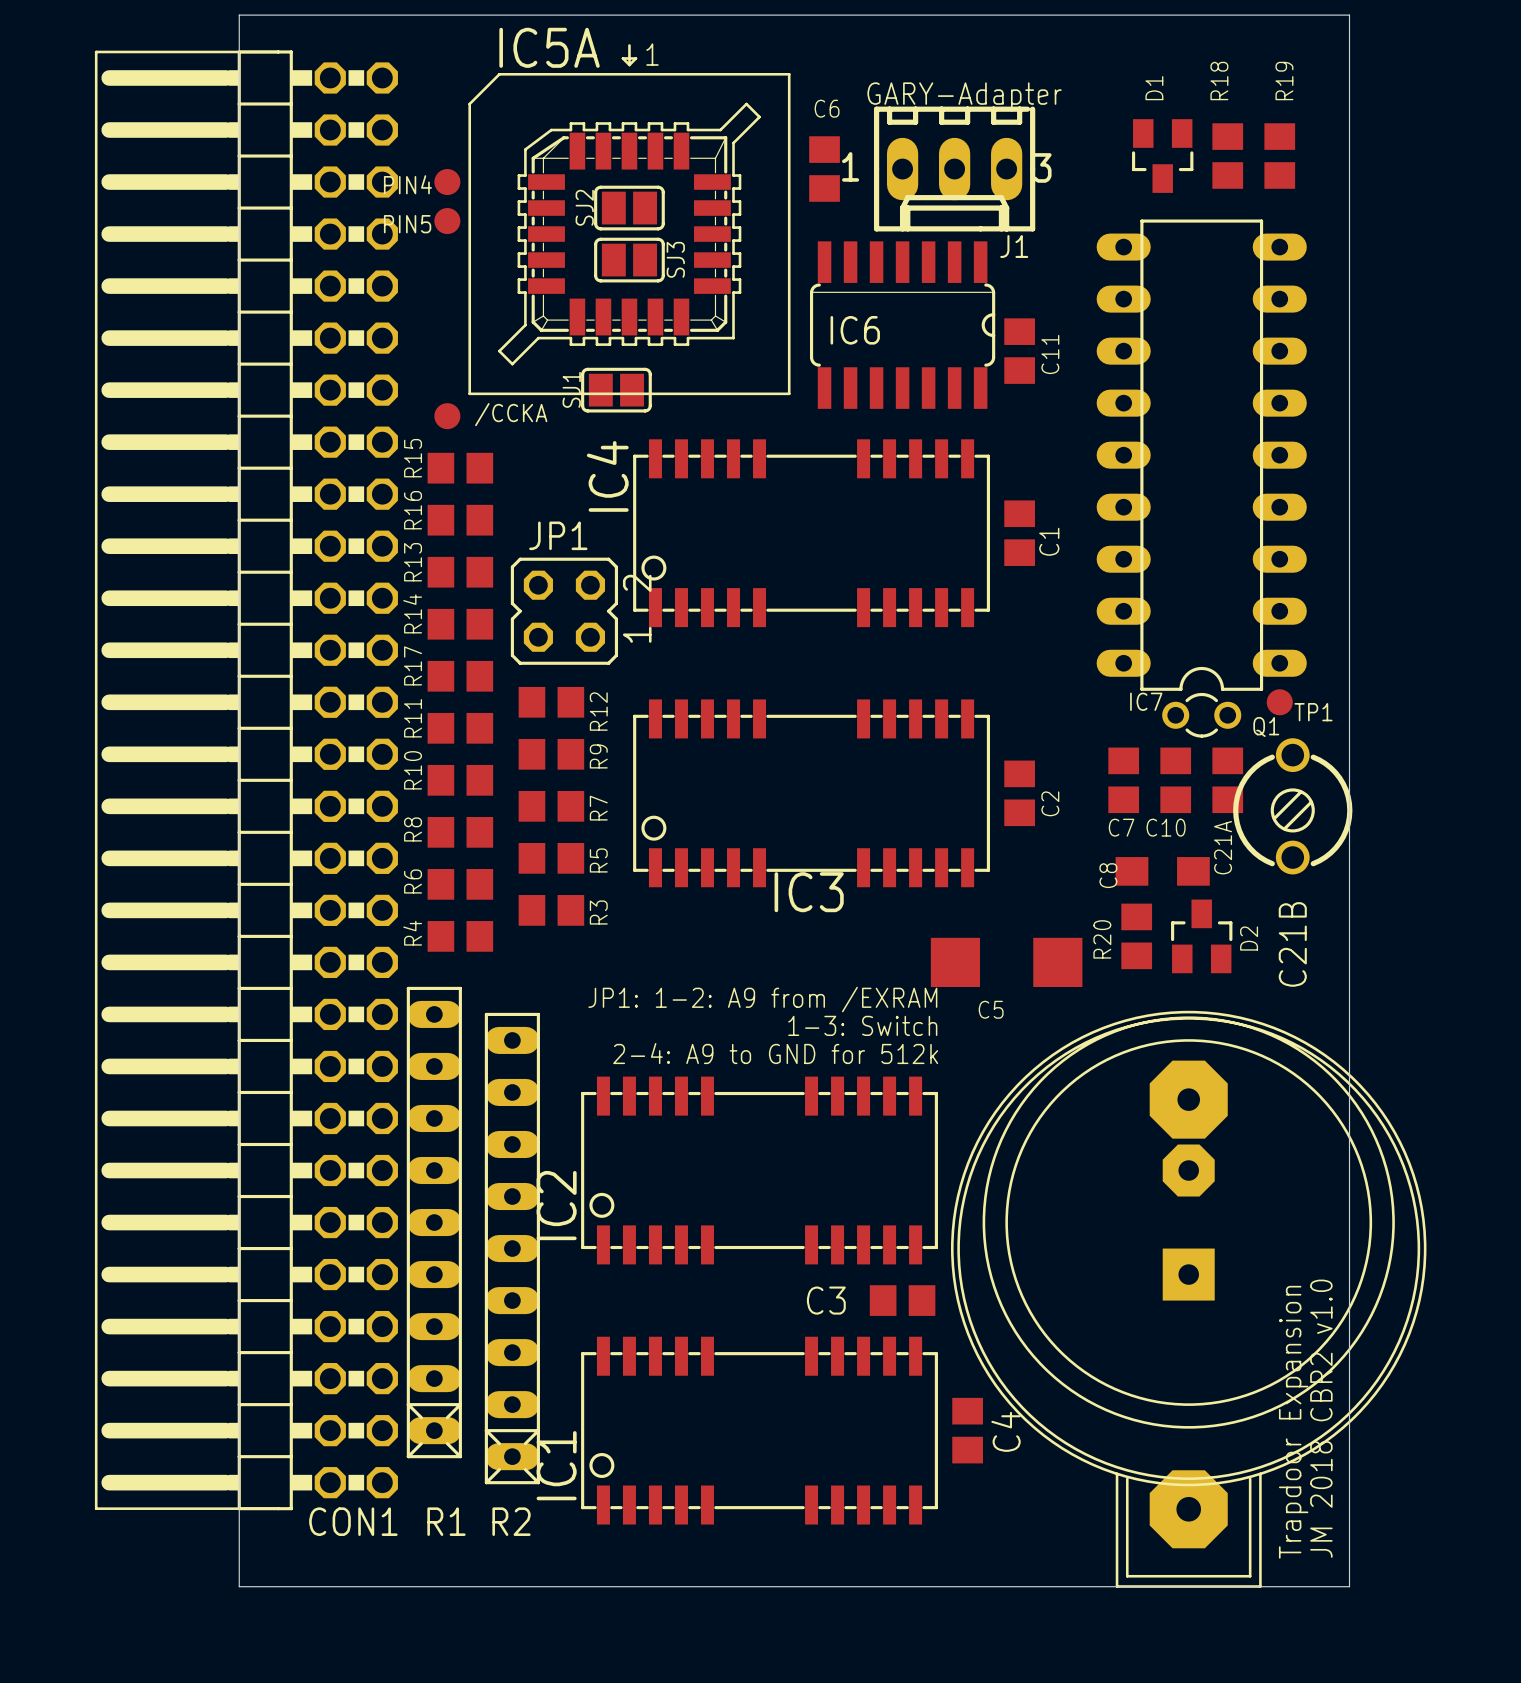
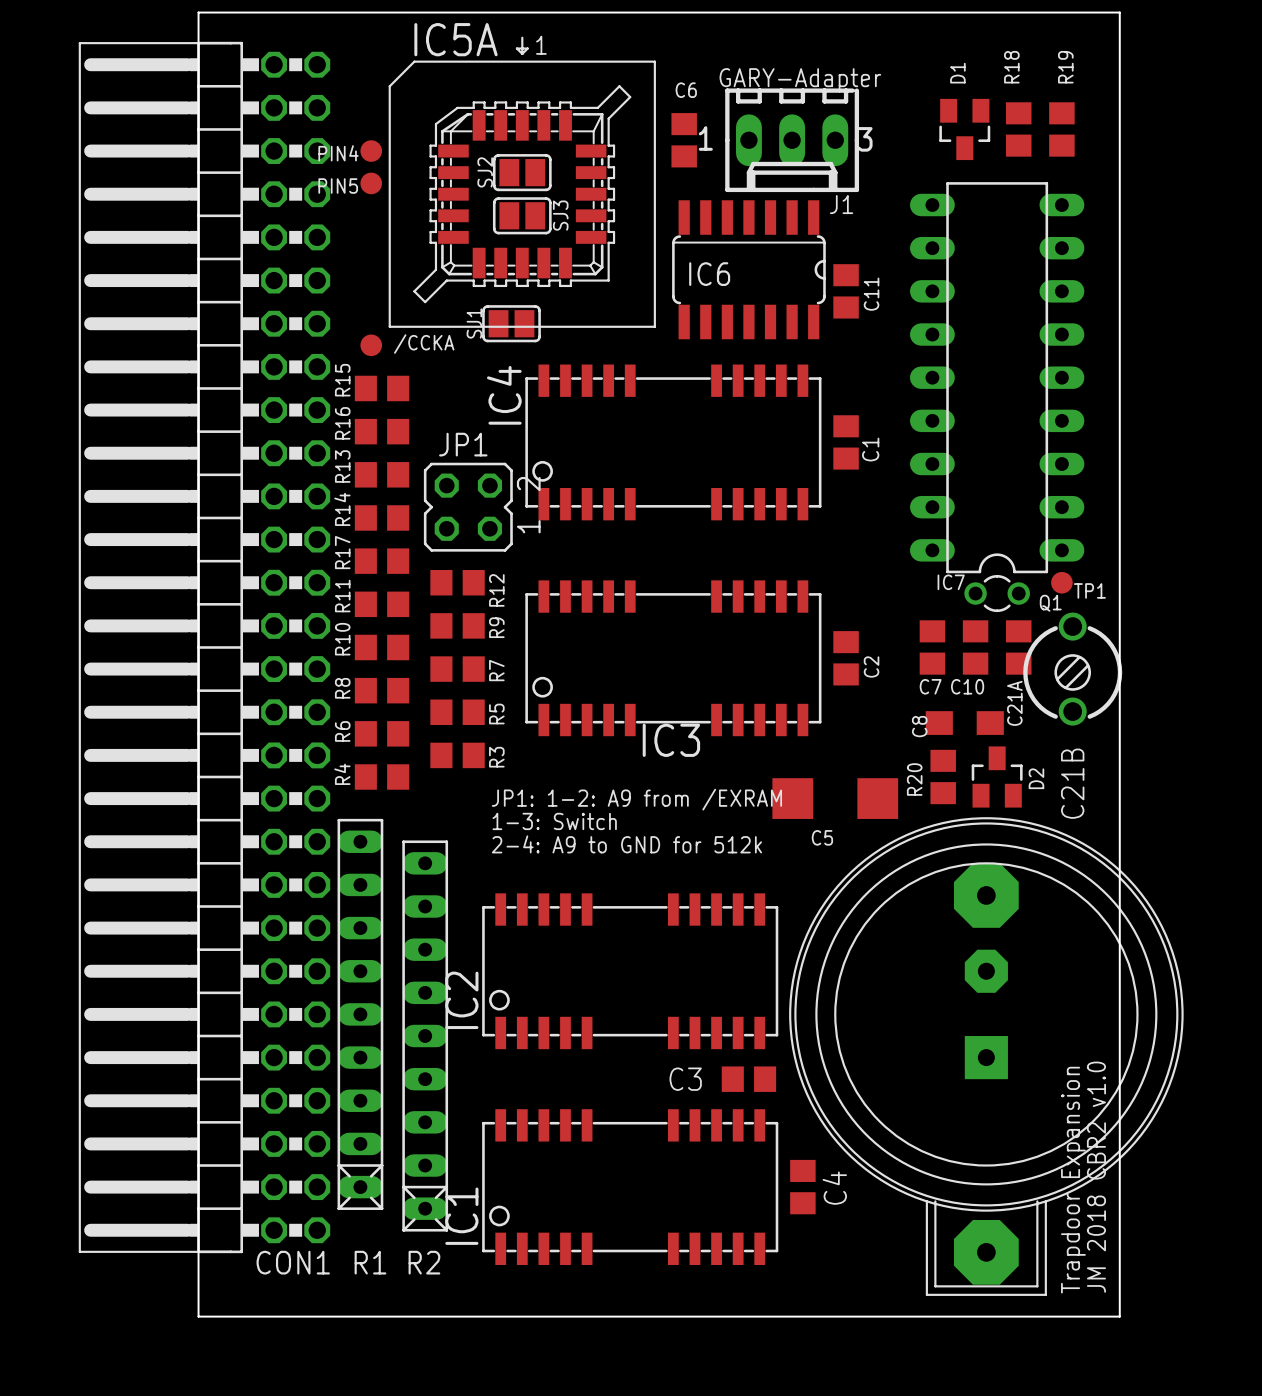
text position: JP1: 1-2: A9 from /EXRAM (762, 999) -> JP1: 1-2: A9 from /EXRAM (636, 799)
text position: 1-3: Switch (862, 1025) -> 1-3: Switch (554, 821)
text position: 2-4: A9 to GND for 512k (775, 1053) -> 2-4: A9 to GND for 512k (626, 844)
part: none -> (986, 1056)
part: (1188, 1299) -> none

